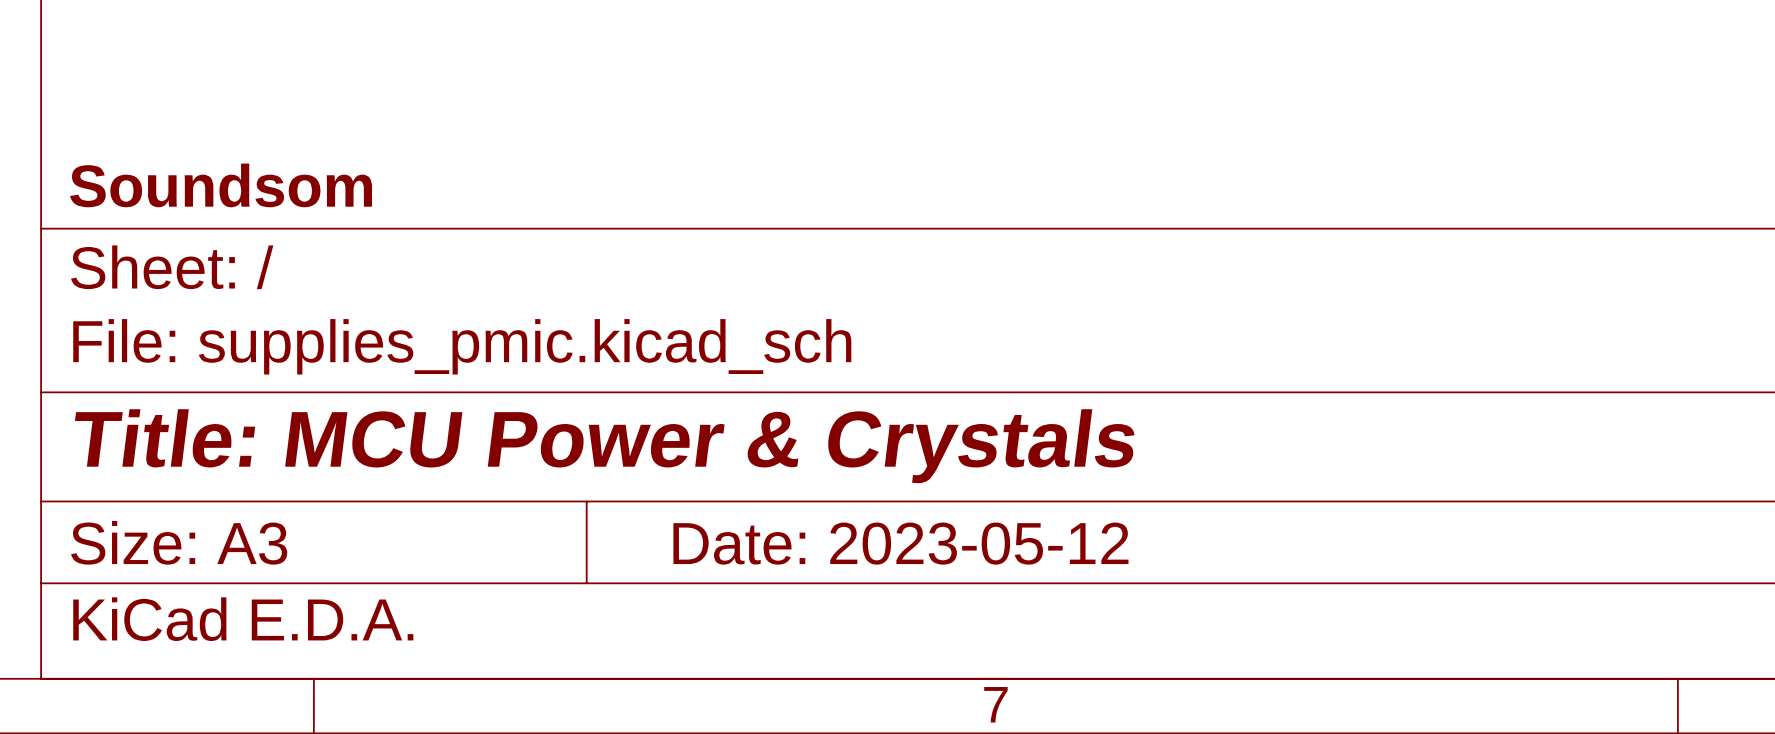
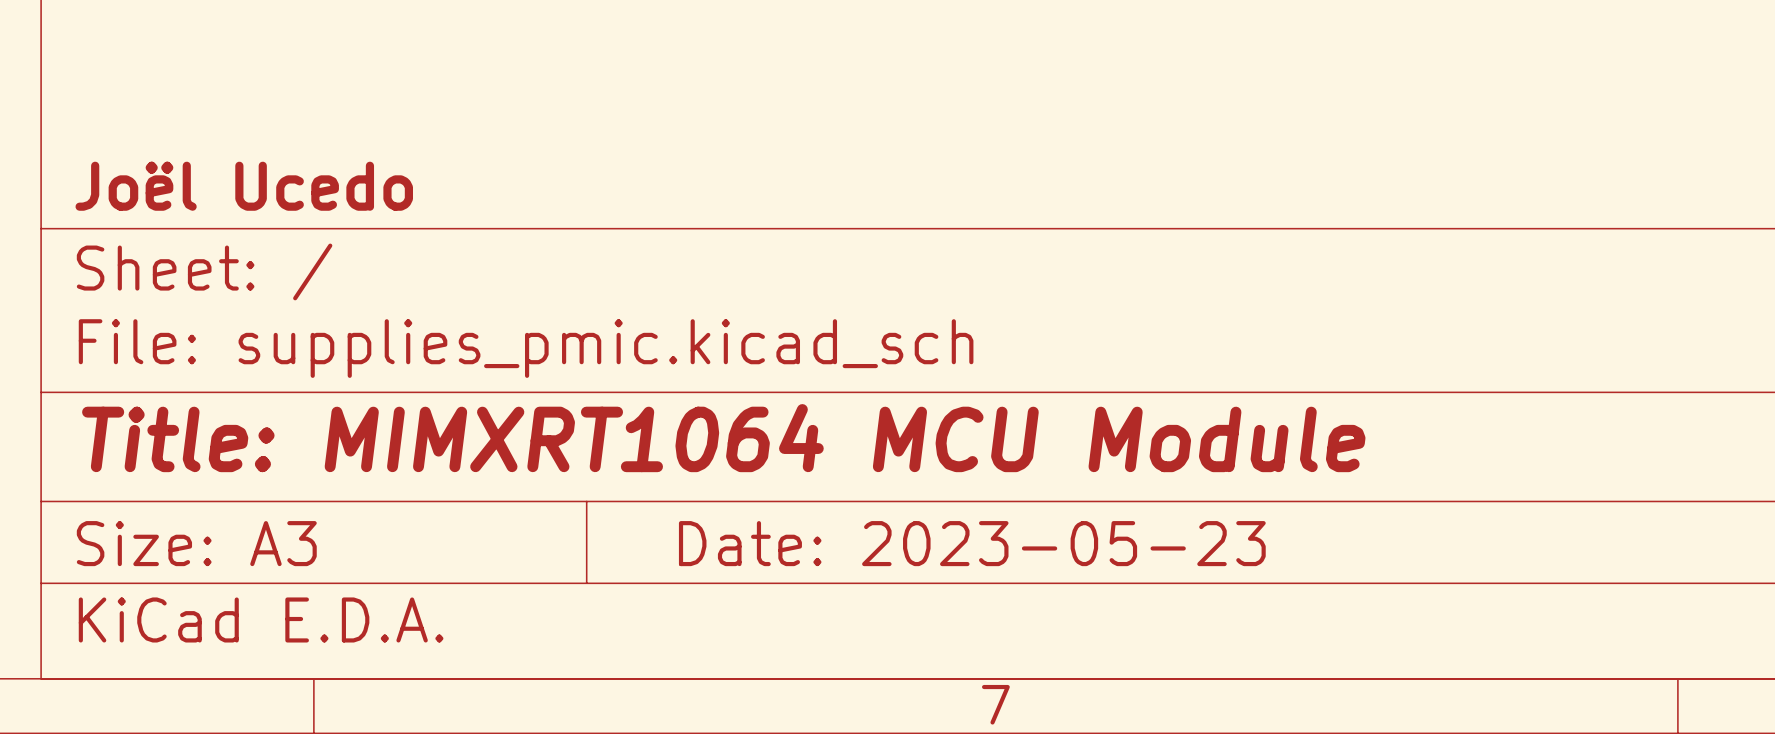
title block: Soundsom (221, 185) -> Joël Ucedo (244, 186)
title block: Title: MCU Power & Crystals (604, 446) -> Title: MIMXRT1064 MCU Module (723, 438)
title block: Date: 2023-05-12 (900, 543) -> Date: 2023-05-23 (972, 543)

